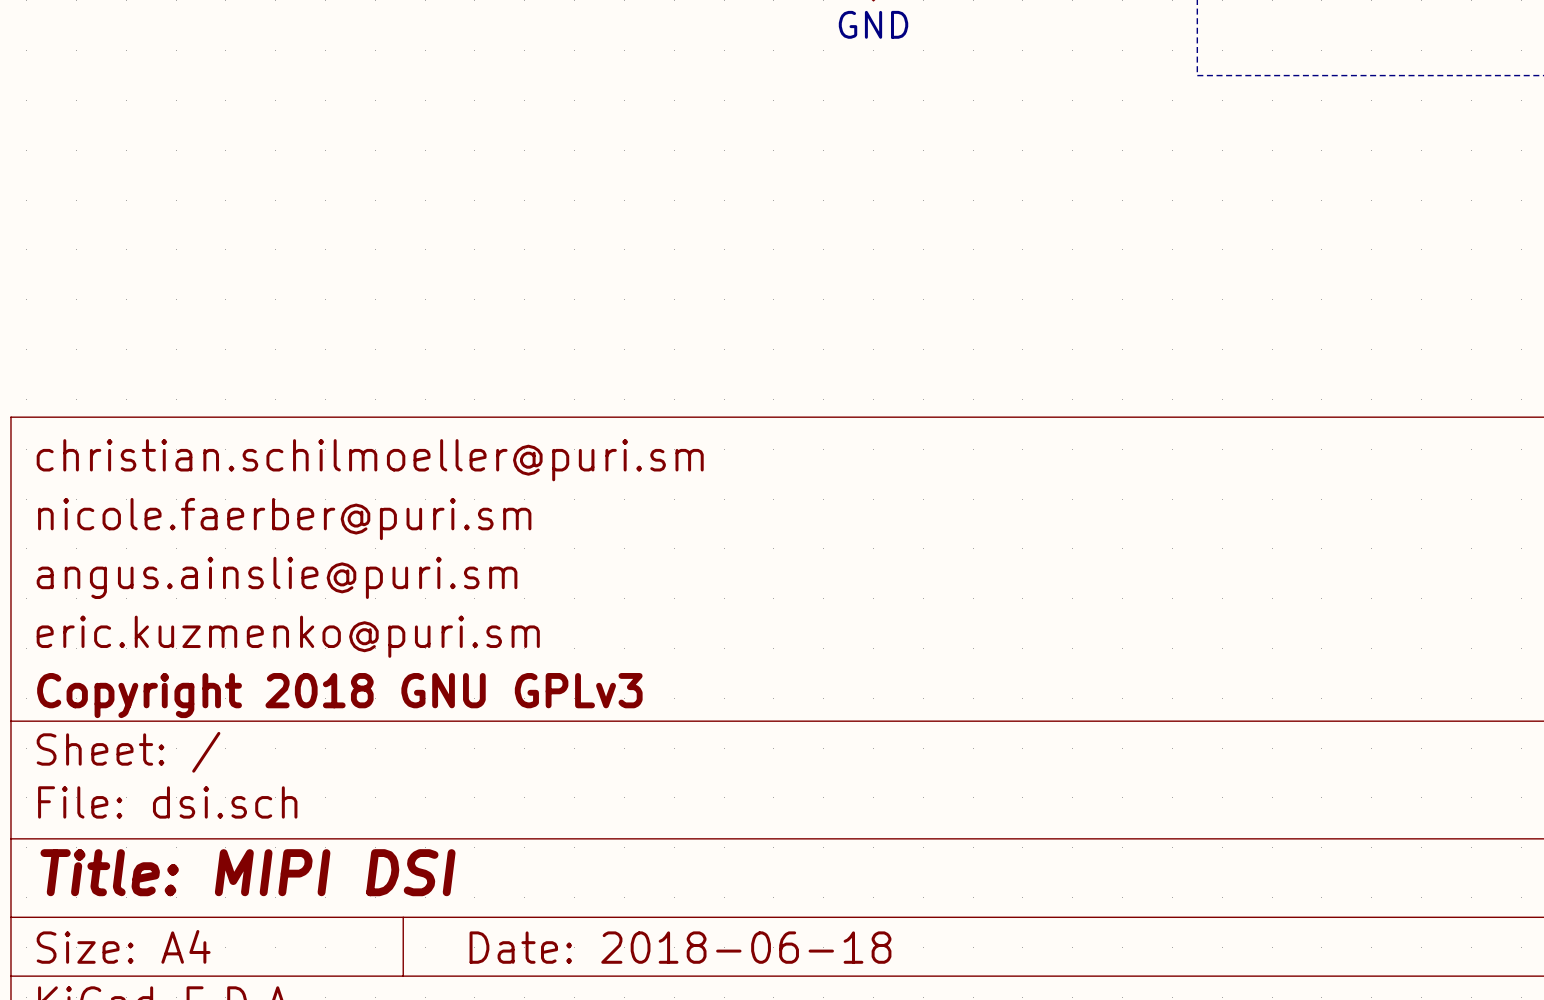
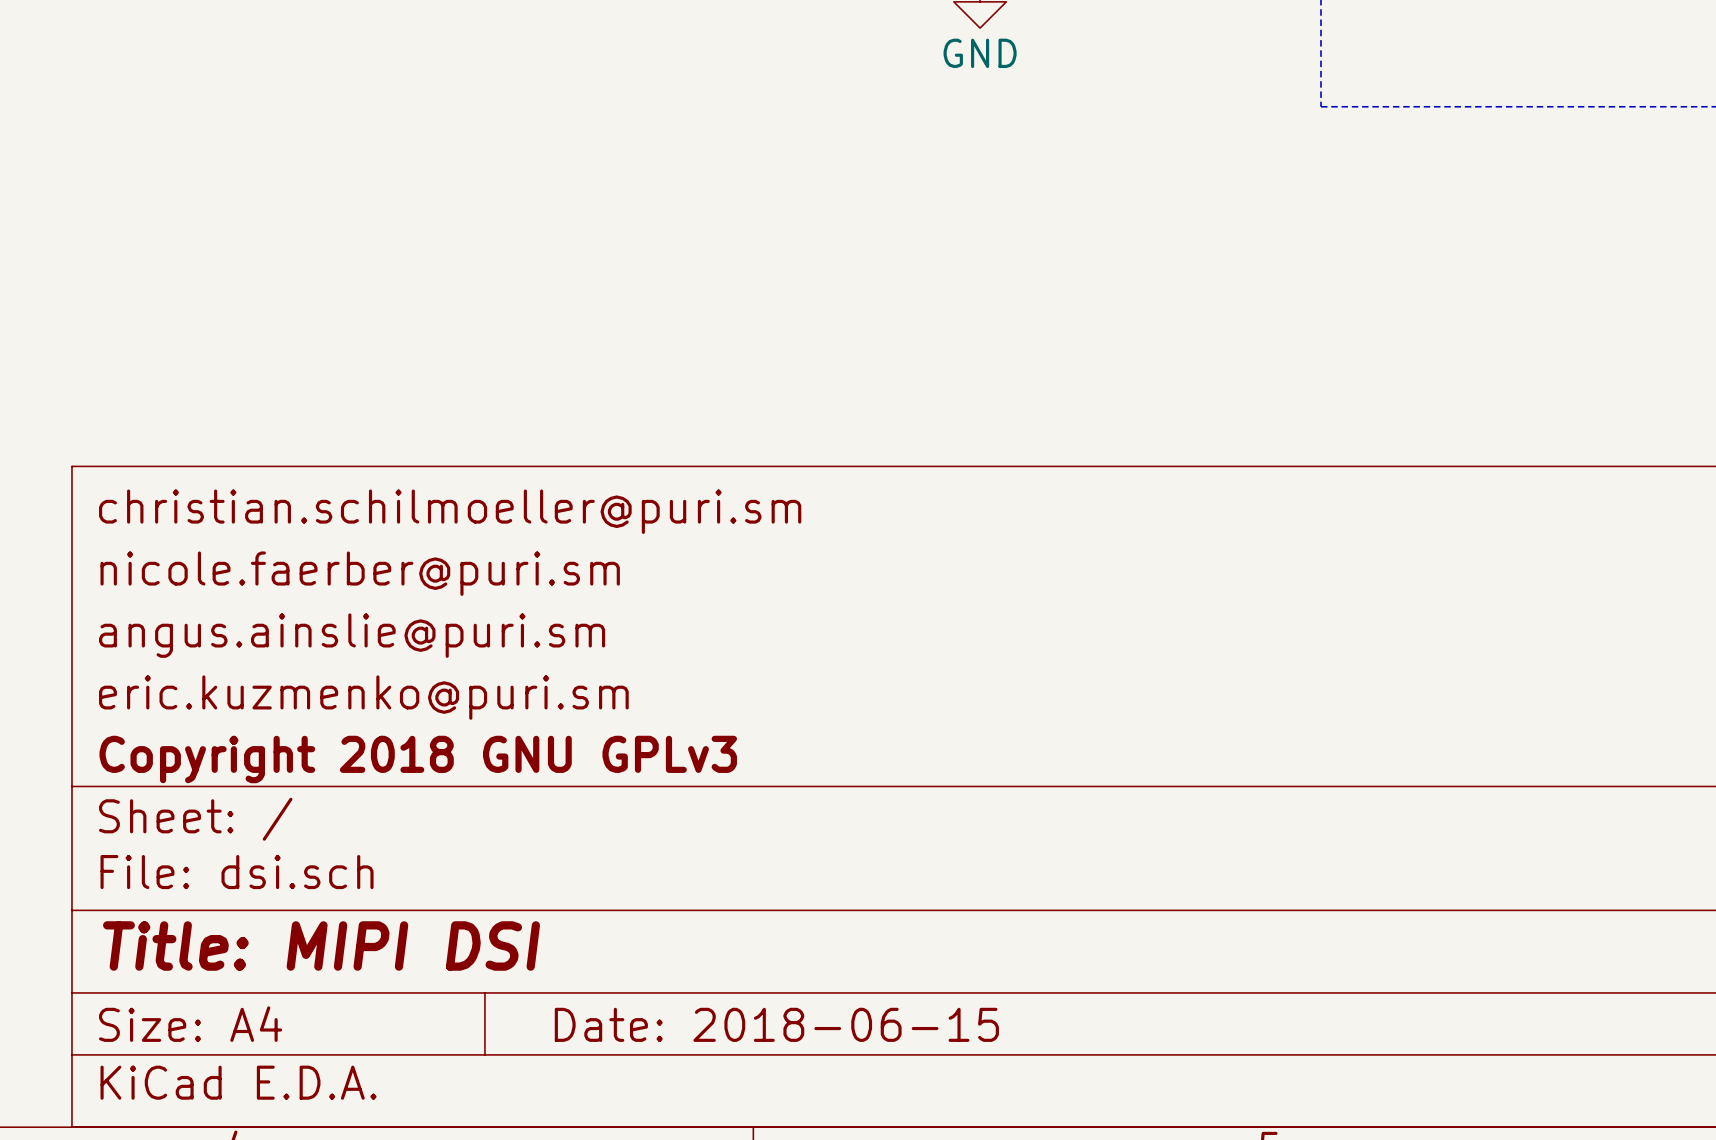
title block: Date: 2018-06-18 (680, 947) -> Date: 2018-06-15 (776, 1024)

